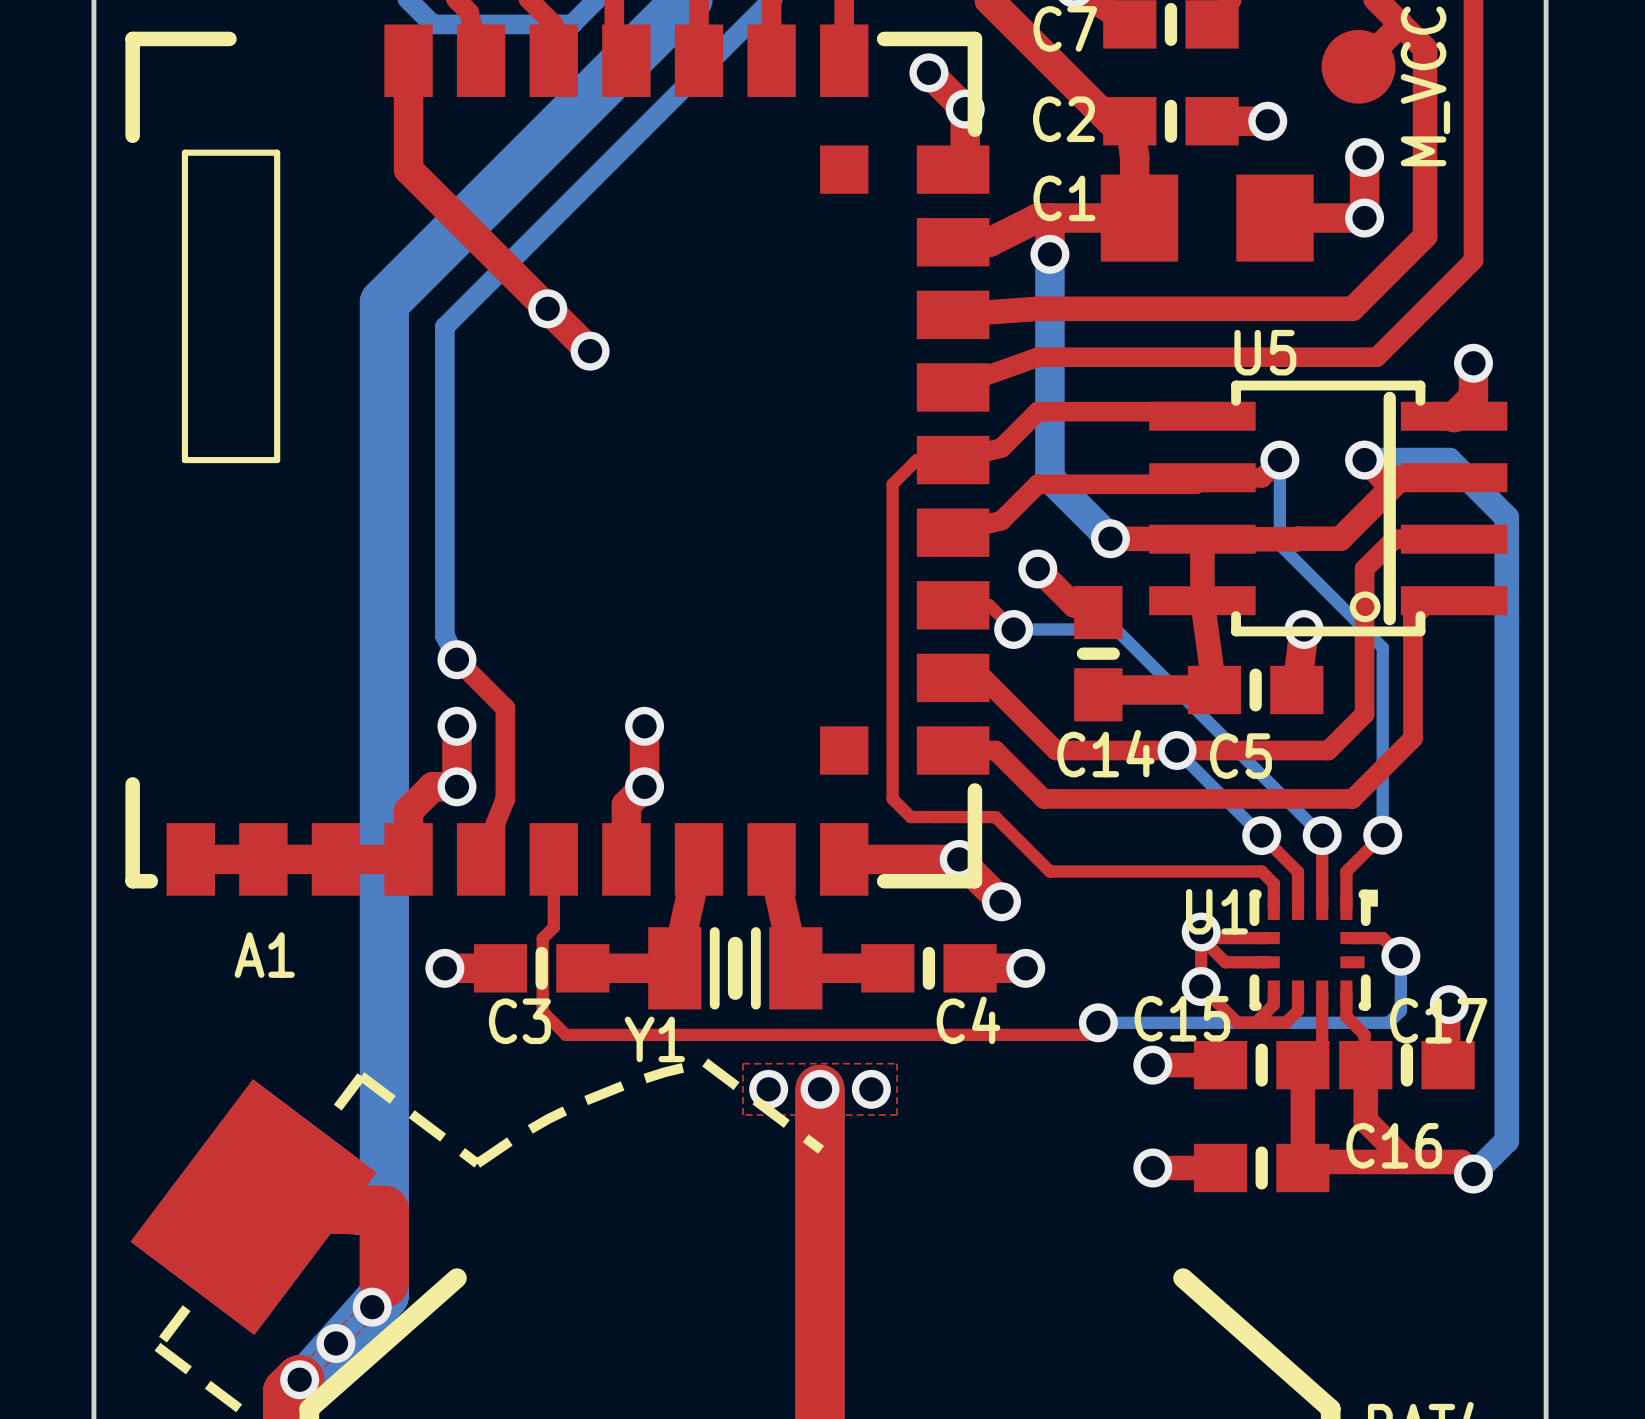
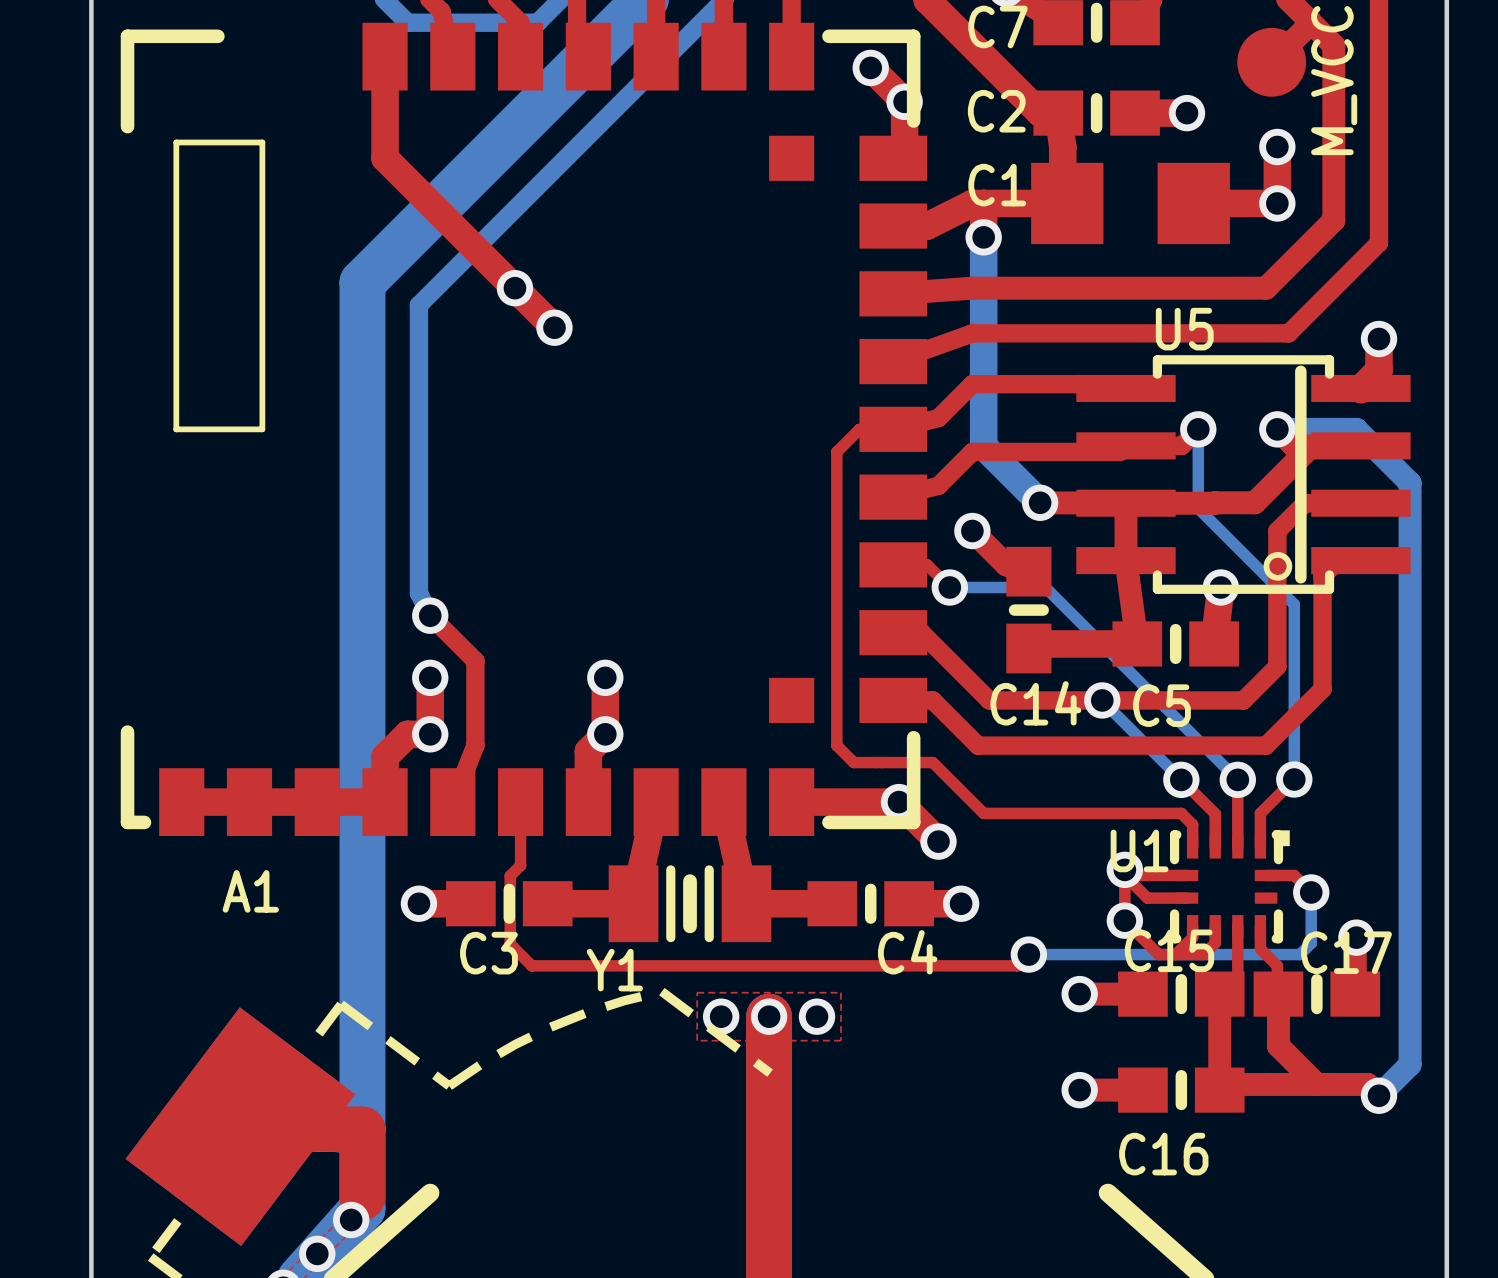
C15 name position: C15 (1182, 1018) -> C15 (1169, 950)
C16 name position: C16 (1394, 1145) -> C16 (1163, 1154)

